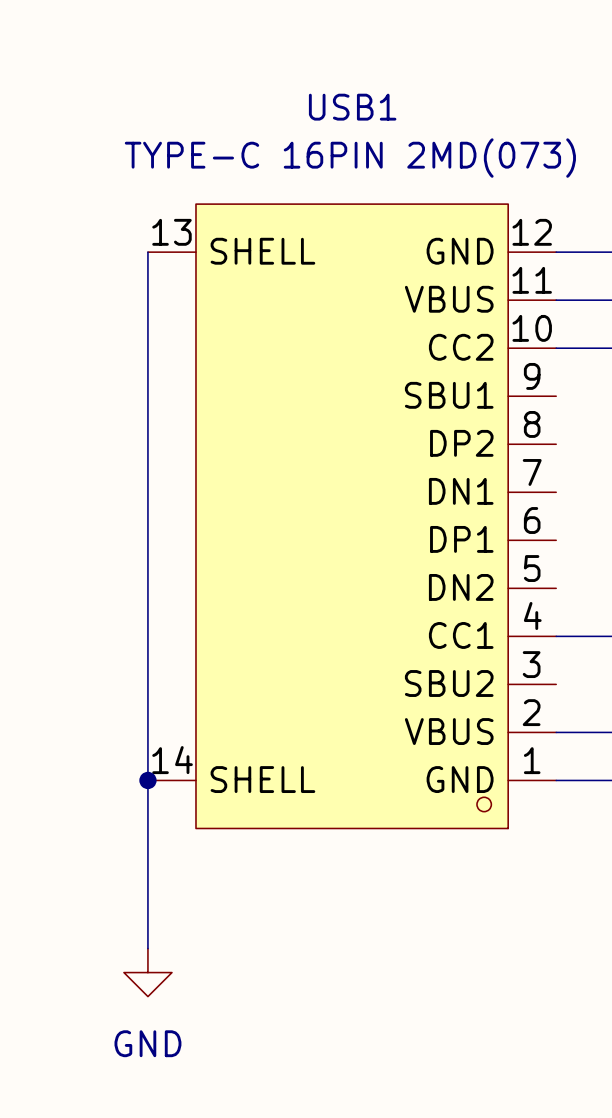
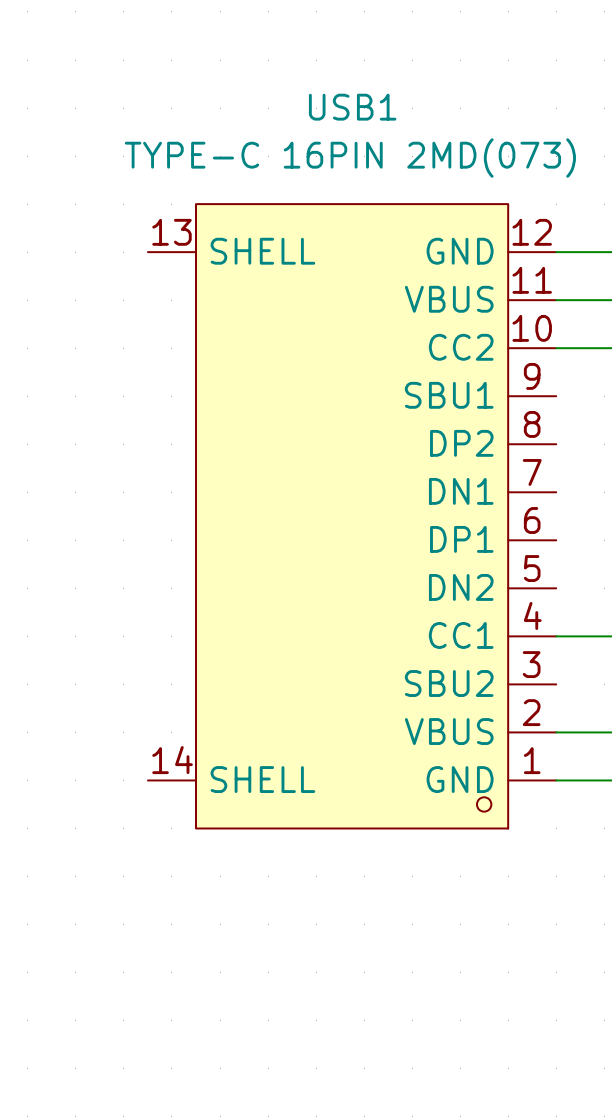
wire: (147, 252) (147, 948) -> none
junction: (147, 780) -> none
power symbol: GND (147, 972) -> none

